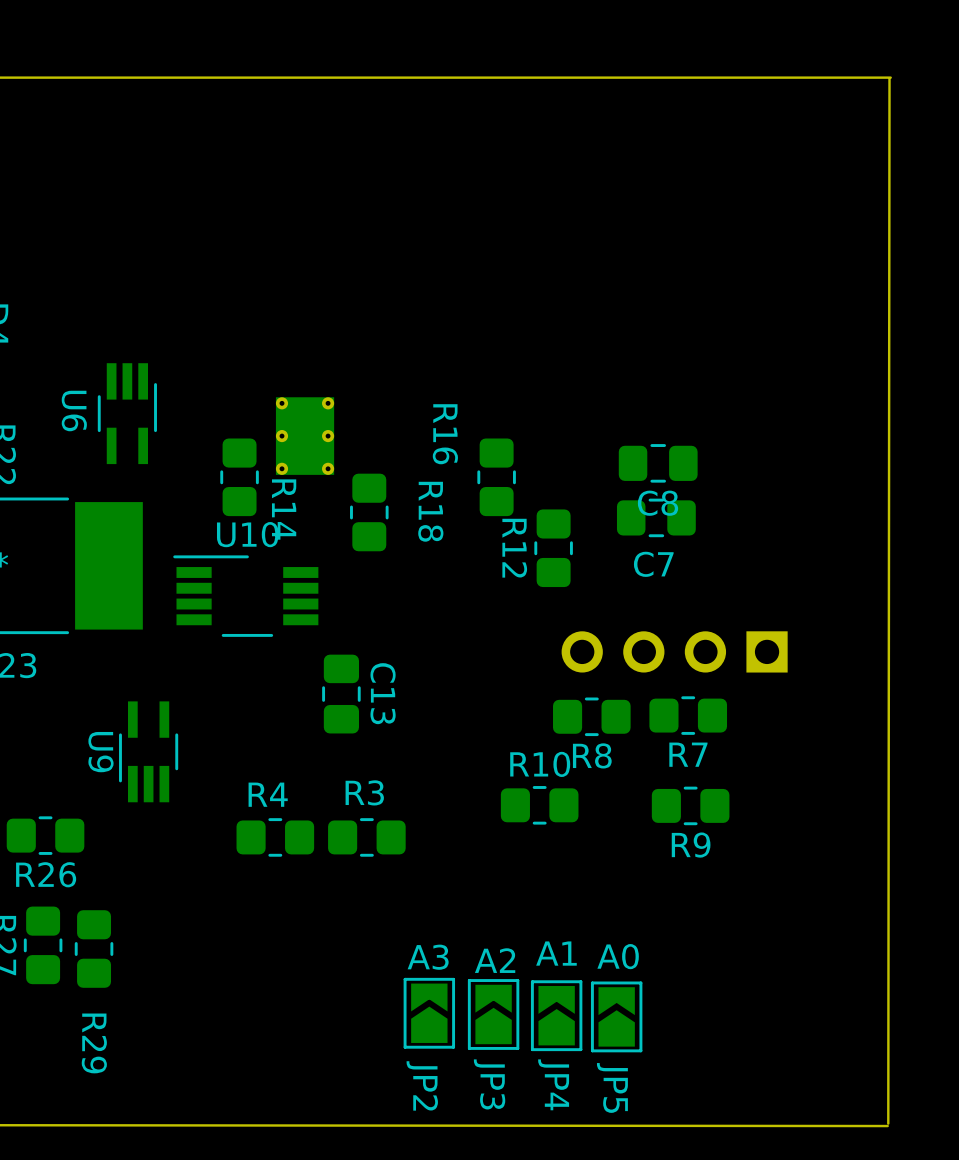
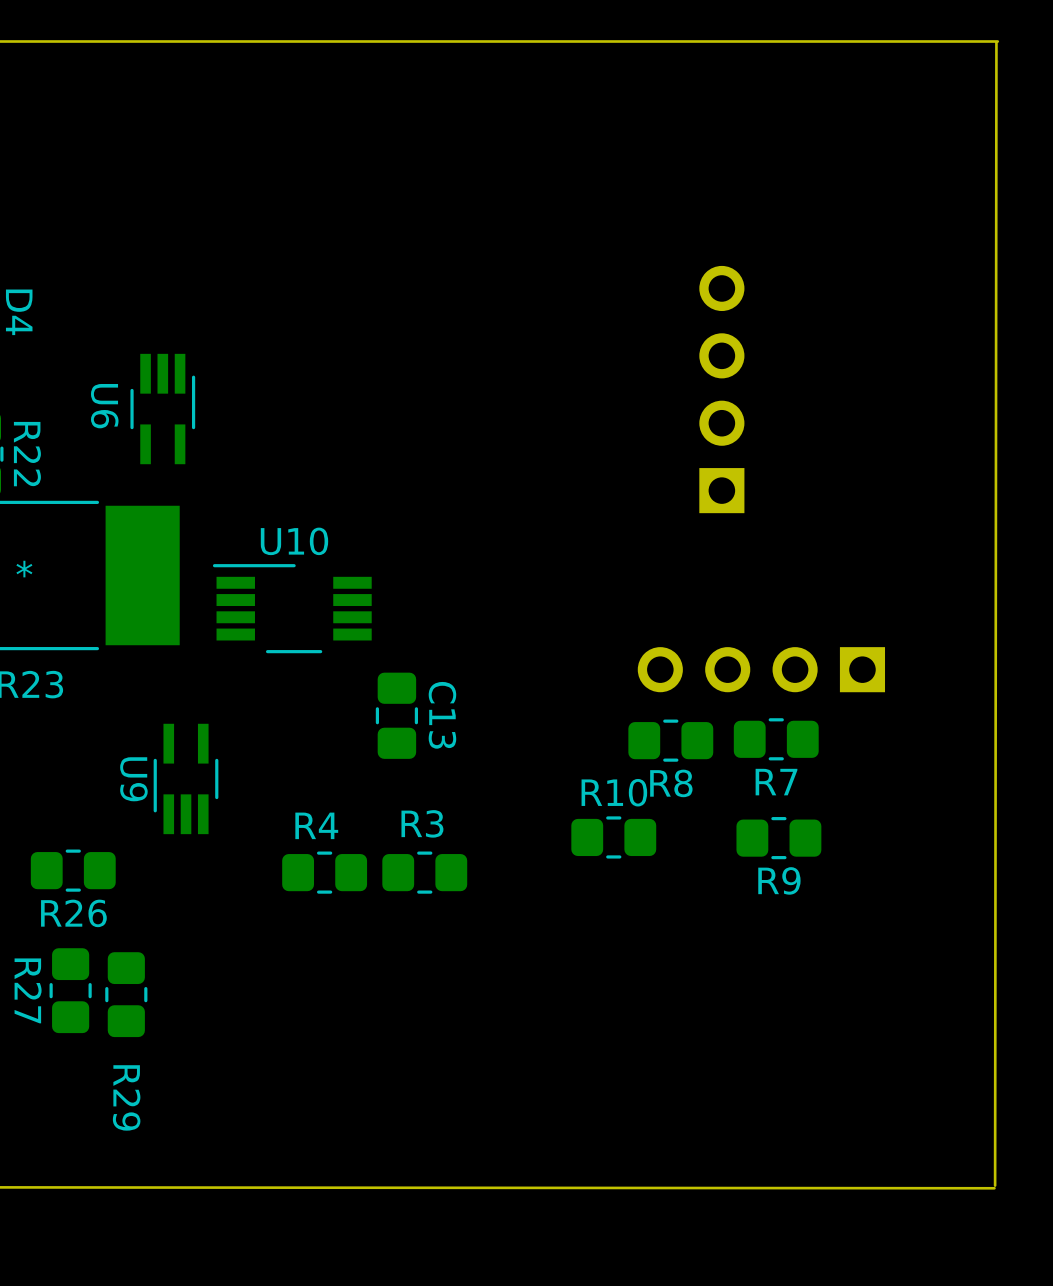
part: none -> (721, 389)
part: (305, 436) -> none
C8: (658, 463) -> none
R14: (239, 477) -> none
R16: (496, 477) -> none
R18: (369, 512) -> none
C7: (656, 517) -> none
R12: (553, 548) -> none
JP2: A3 (429, 1013) -> none
JP3: A2 (493, 1014) -> none
JP4: A1 (556, 1015) -> none
JP5: A0 (616, 1016) -> none

